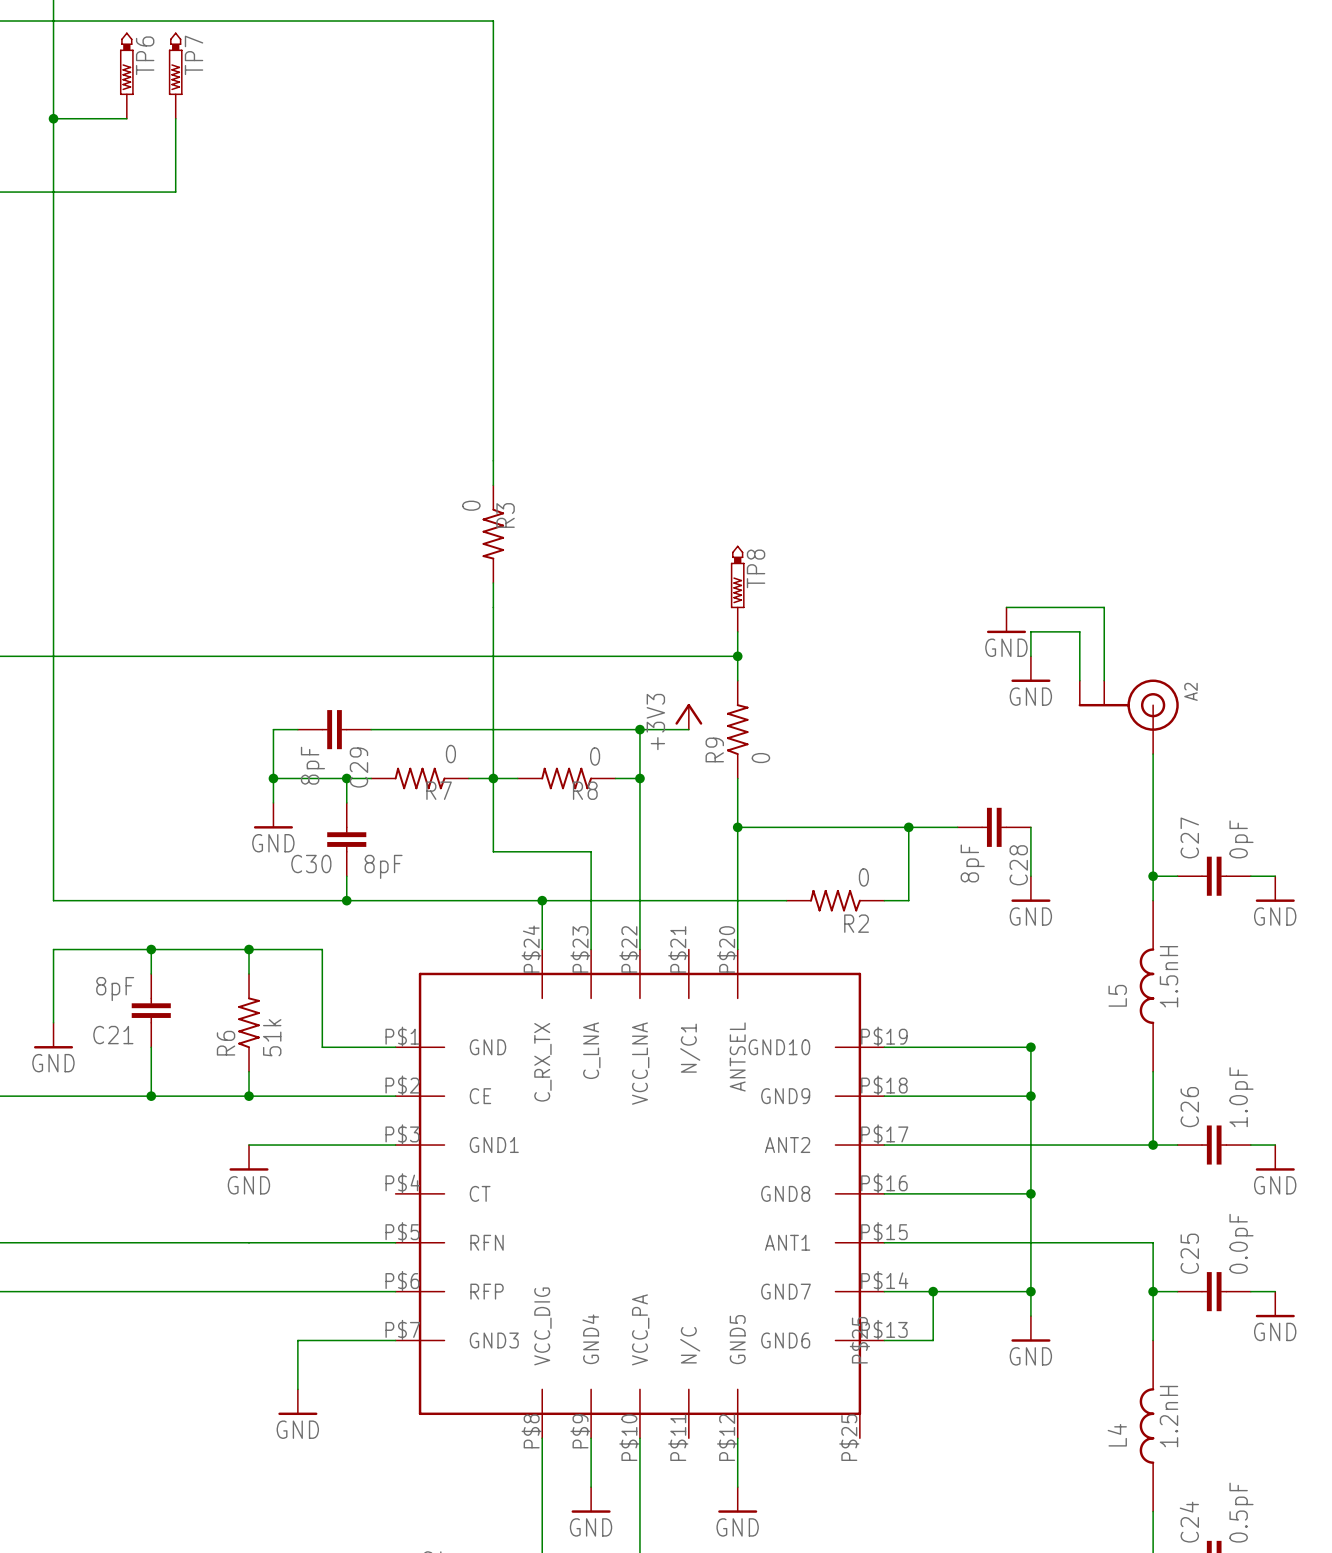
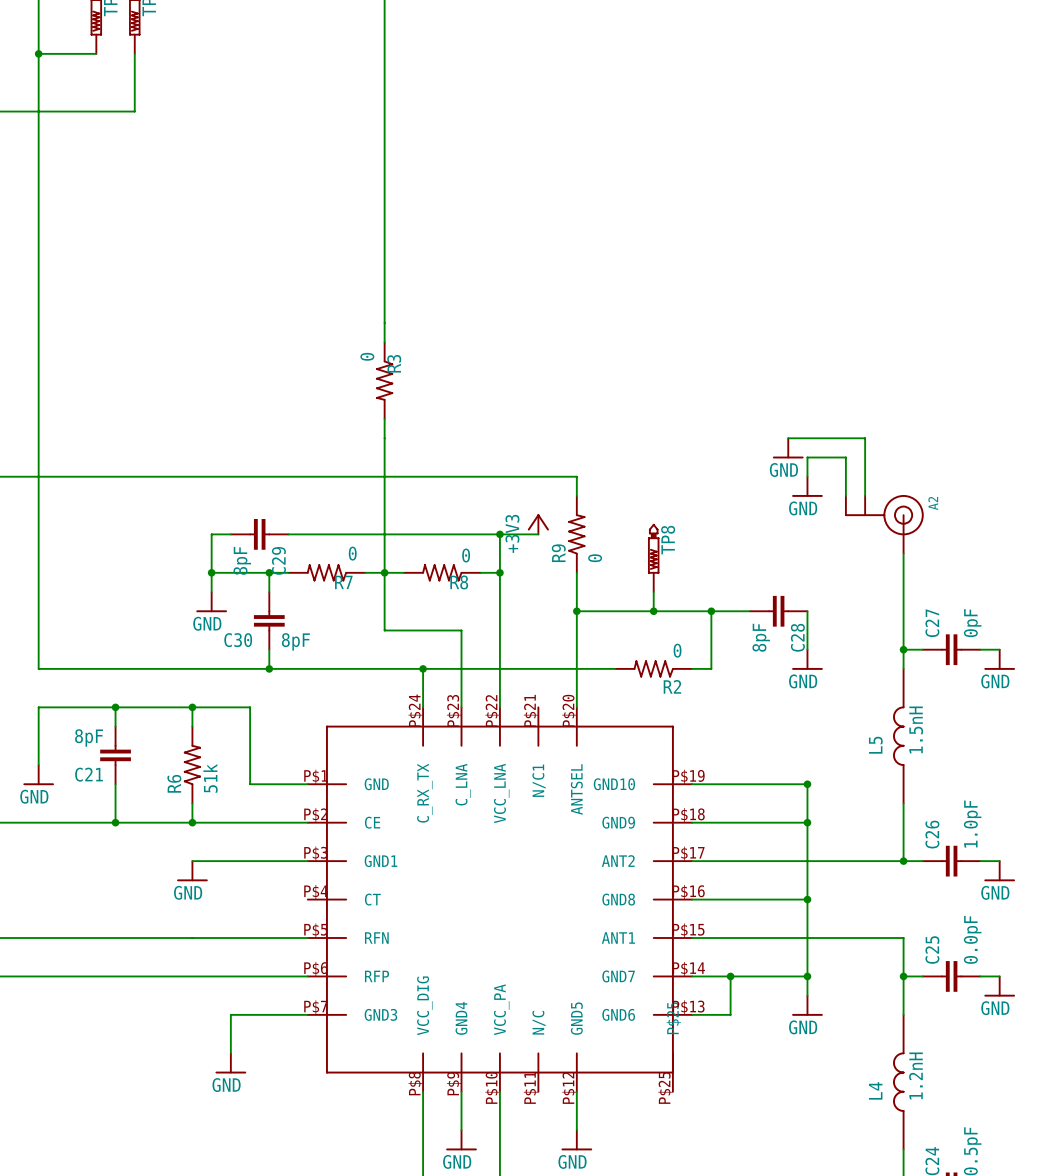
TP8 position: (737, 588) -> (653, 558)
wire: (737, 631) (737, 656) -> (653, 592) (653, 611)
junction: (737, 656) -> none
junction: none -> (653, 611)

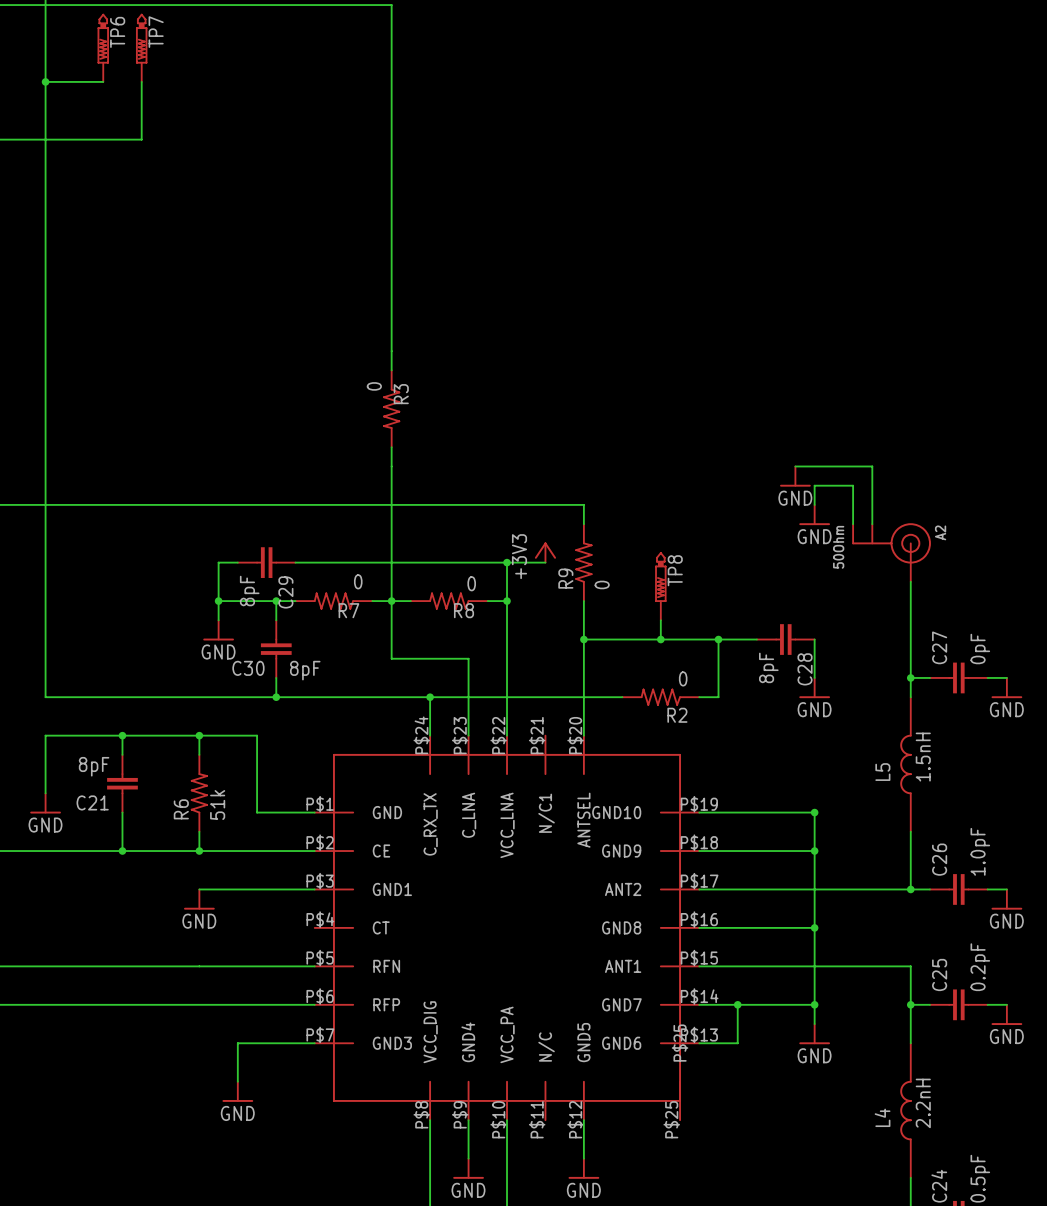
A2 value: none -> 50Ohm (838, 547)
C25 value: 0.0pF (972, 939) -> 0.2pF (980, 967)
L4 value: 1.2nH (915, 1075) -> 2.2nH (923, 1103)

